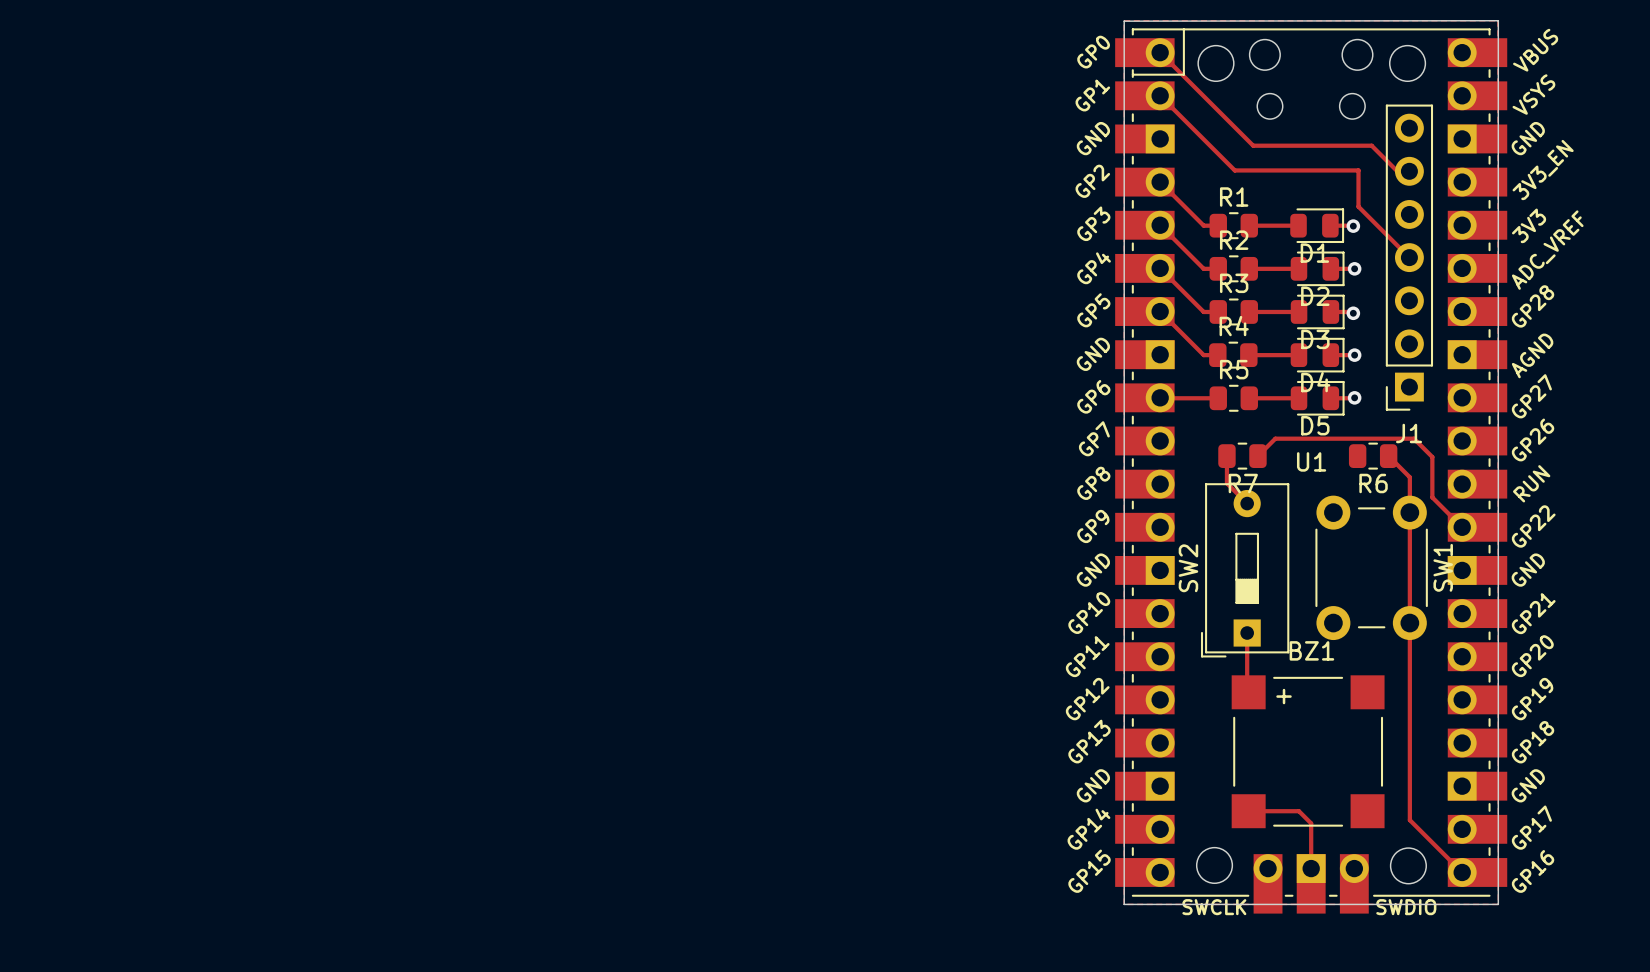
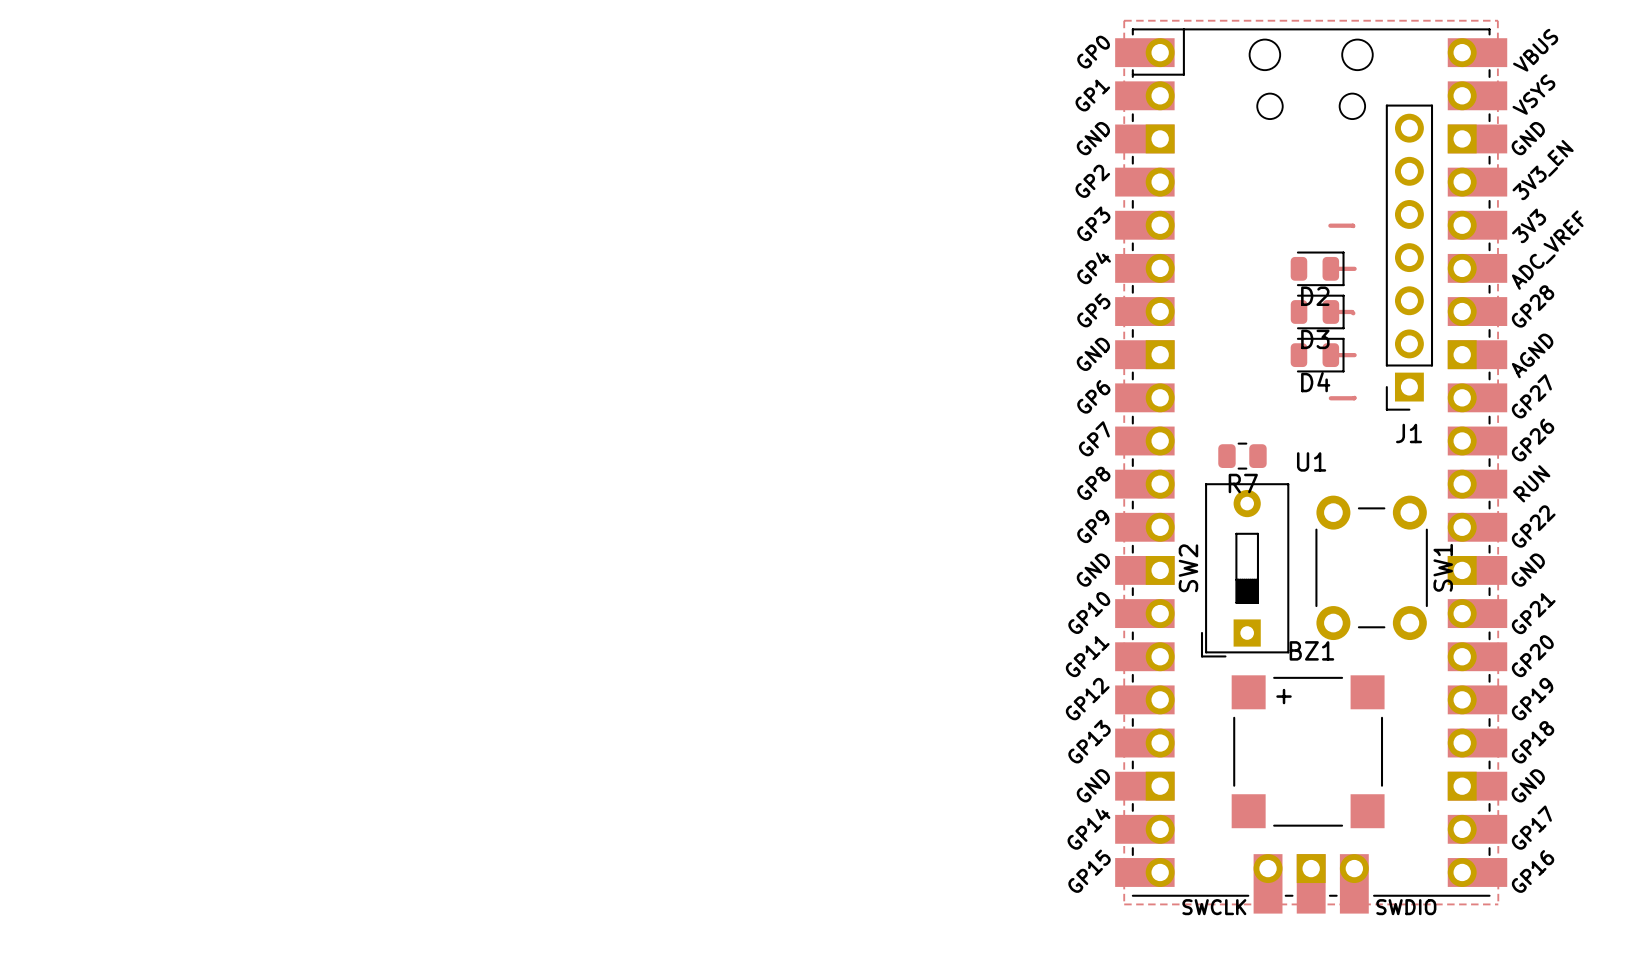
board edge: (1498, 20) (1498, 904) (1124, 904) (1124, 21) (1498, 20) -> none
round board edge: [1197, 45, 1235, 82] -> none
round board edge: [1389, 45, 1426, 82] -> none
track: (1160, 52) (1253, 145) (1371, 145) (1397, 171) (1409, 171) -> none
track: (1160, 95) (1234, 170) (1358, 170) (1358, 206) (1409, 257) -> none
track: (1160, 182) (1203, 225) (1218, 225) -> none
track: (1160, 225) (1203, 268) (1218, 268) -> none
R1: (1233, 225) -> none
track: (1249, 225) (1298, 225) -> none
D1: (1317, 225) -> none
via: (1353, 226) -> none
track: (1160, 268) (1203, 311) (1218, 311) -> none
R2: (1233, 268) -> none
track: (1249, 268) (1298, 268) -> none
via: (1354, 268) -> none
track: (1160, 311) (1203, 355) (1217, 355) -> none
R3: (1233, 311) -> none
track: (1249, 311) (1299, 311) -> none
via: (1353, 313) -> none
R4: (1233, 355) -> none
track: (1248, 355) (1298, 355) -> none
via: (1354, 355) -> none
track: (1160, 397) (1218, 398) -> none
via: (1354, 397) -> none
R5: (1233, 398) -> none
track: (1249, 398) (1299, 398) -> none
D5: (1317, 398) -> none
track: (1226, 456) (1226, 483) (1247, 503) -> none
track: (1257, 456) (1275, 438) (1414, 438) (1432, 457) (1432, 497) (1462, 527) -> none
R6: (1373, 456) -> none
track: (1388, 456) (1409, 477) (1409, 820) (1462, 872) -> none
track: (1247, 633) (1248, 692) -> none
track: (1248, 811) (1298, 811) (1311, 823) (1311, 868) -> none
round board edge: [1196, 847, 1233, 884] -> none
round board edge: [1390, 847, 1427, 885] -> none

